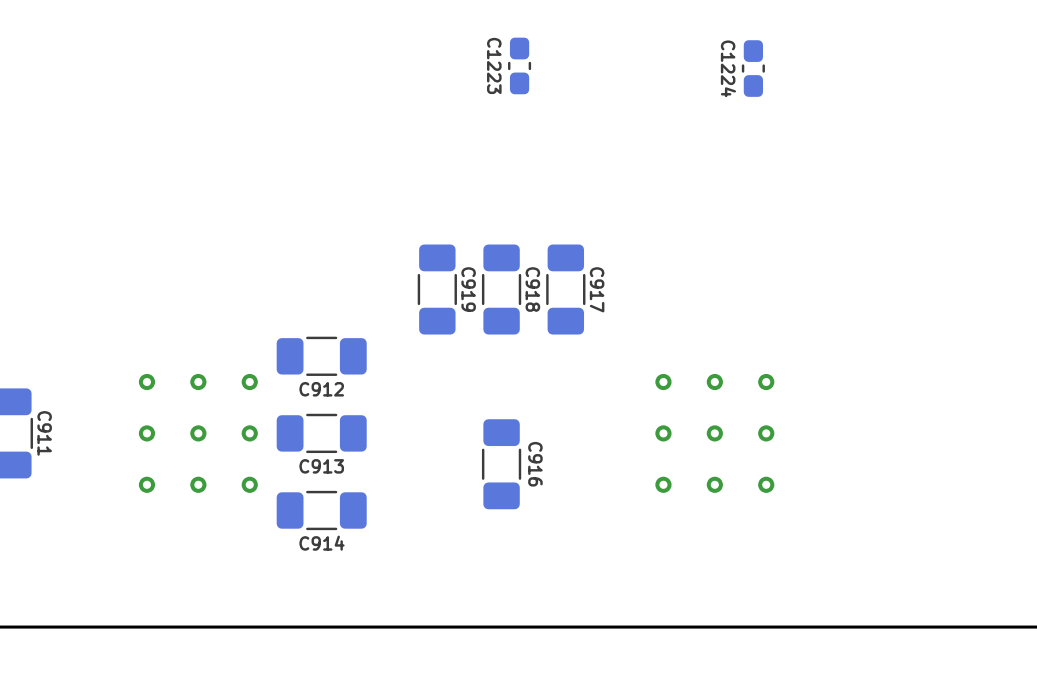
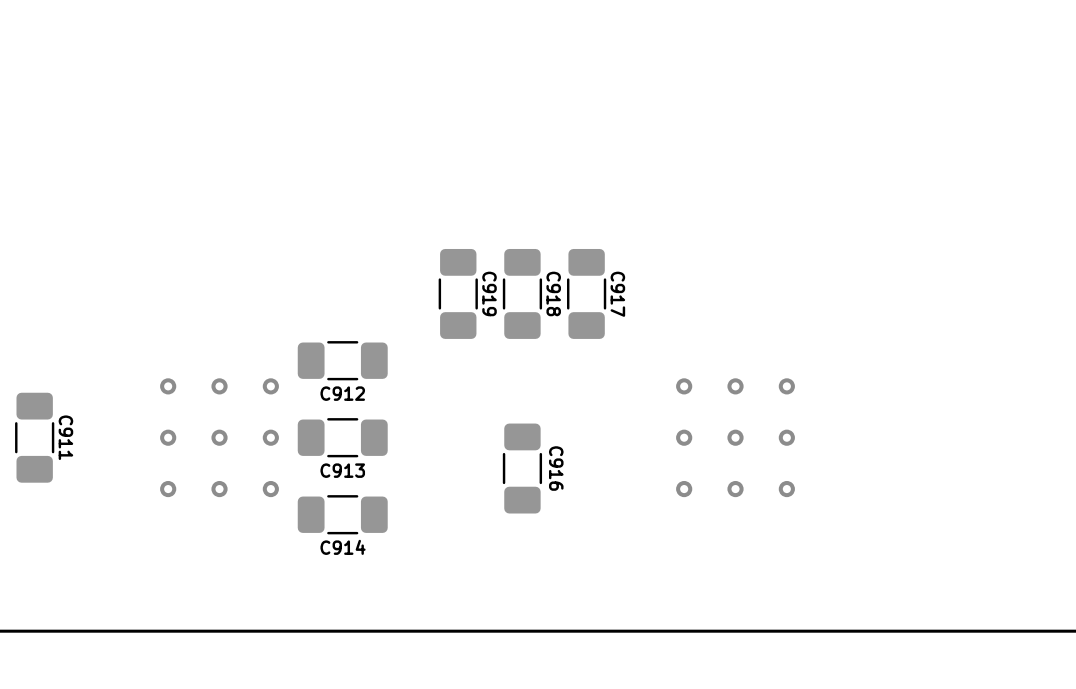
C1223: (519, 65) -> none
C1224: (753, 68) -> none

